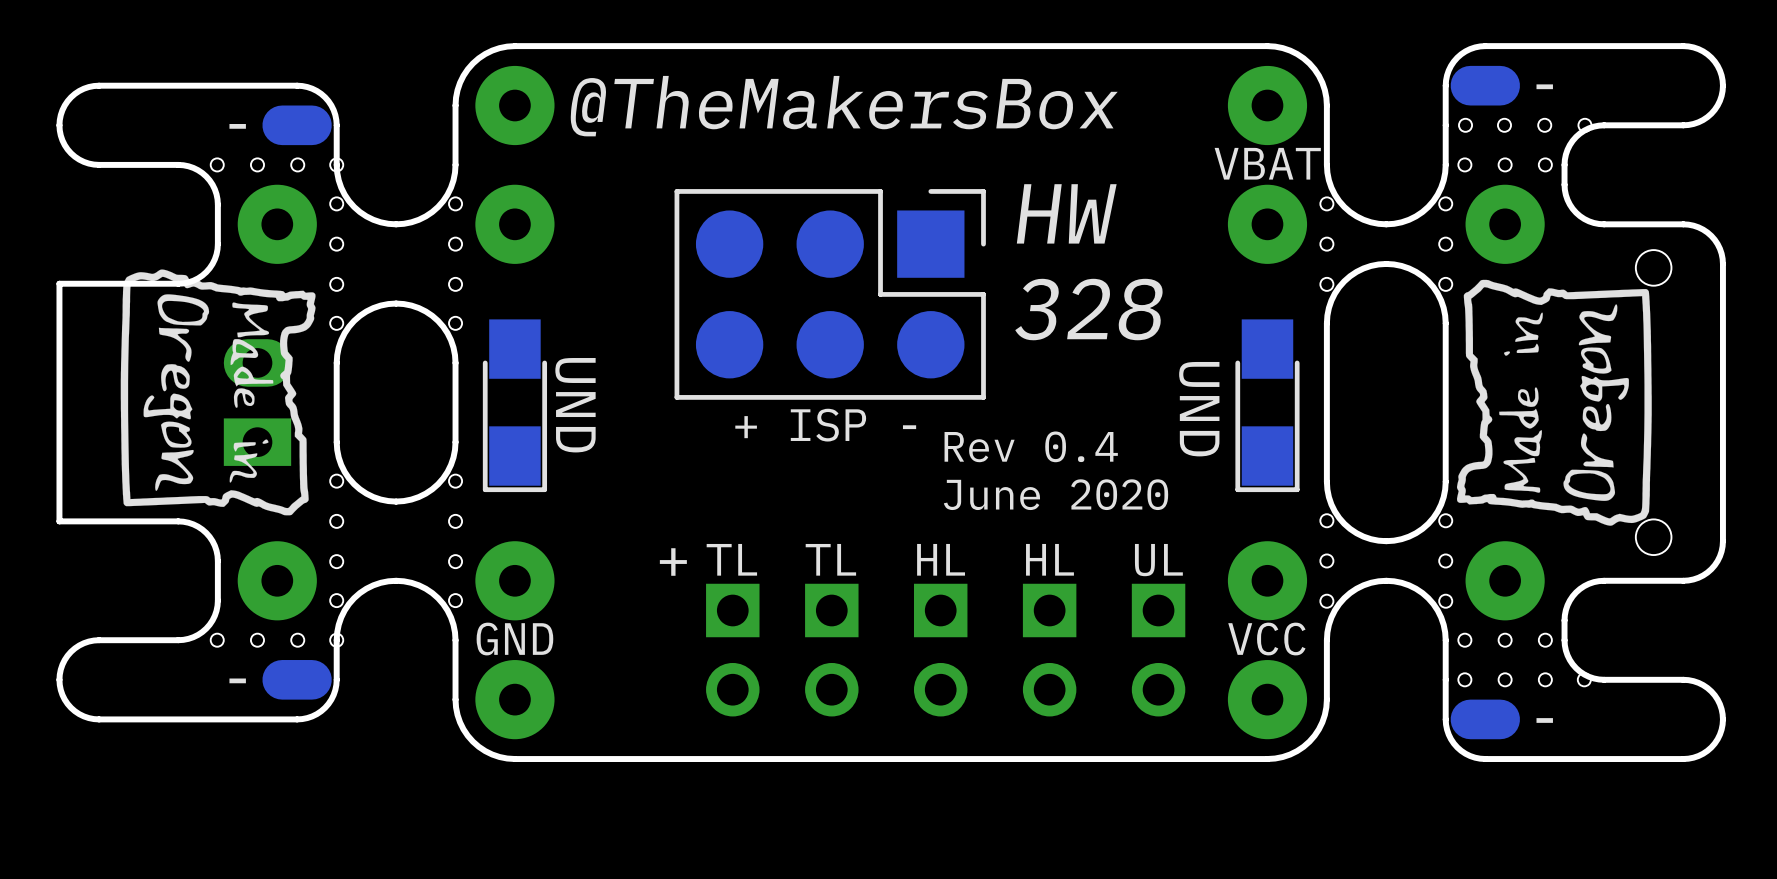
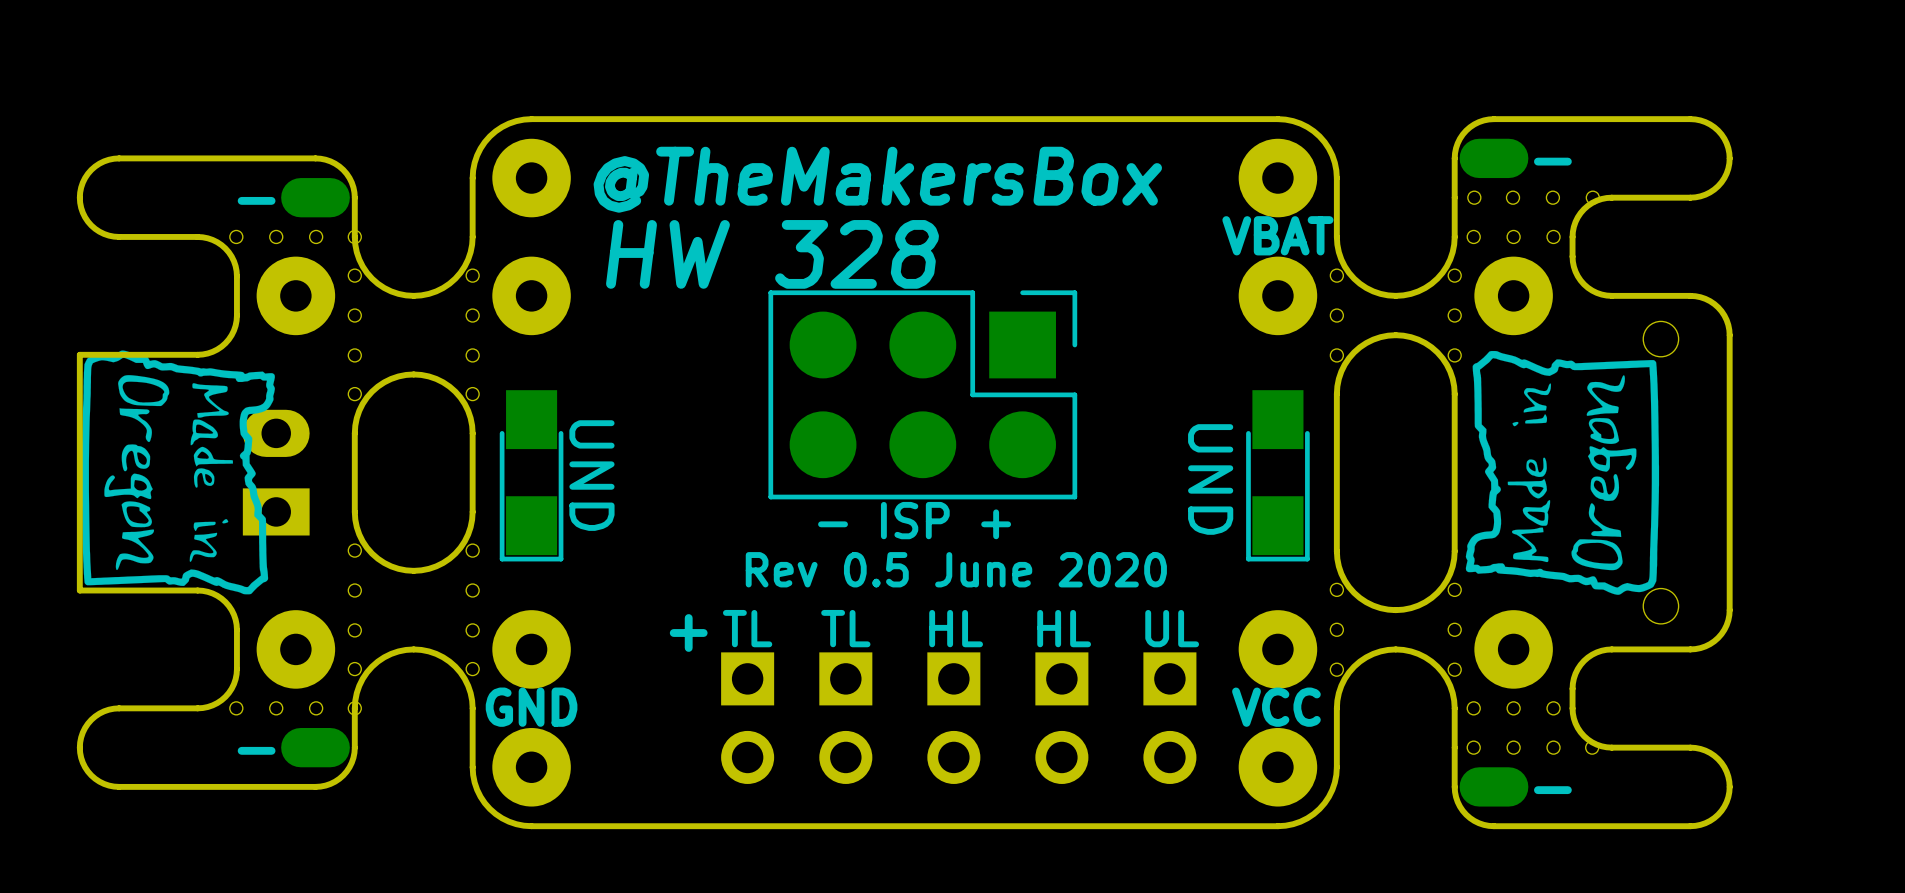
text: none -> HW 328 (772, 254)
text: HW (1066, 213) -> none
part position: (830, 294) -> (922, 394)
text: 328 (1089, 309) -> none
drawing position: (218, 392) -> (178, 472)
text: + ISP - (825, 425) -> - ISP + (914, 520)
text: Rev 0.4 (1031, 446) -> none
text: June 2020 (1056, 494) -> Rev 0.5 June 2020 (956, 569)

